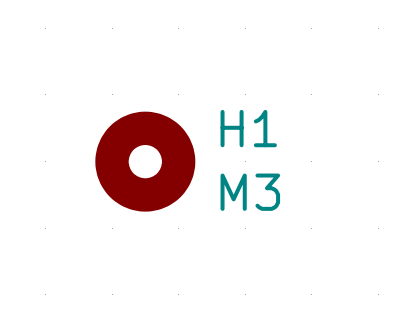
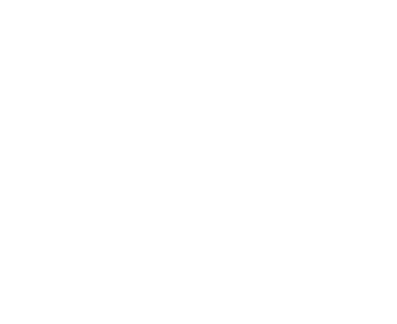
H1: M3 (145, 161) -> none

